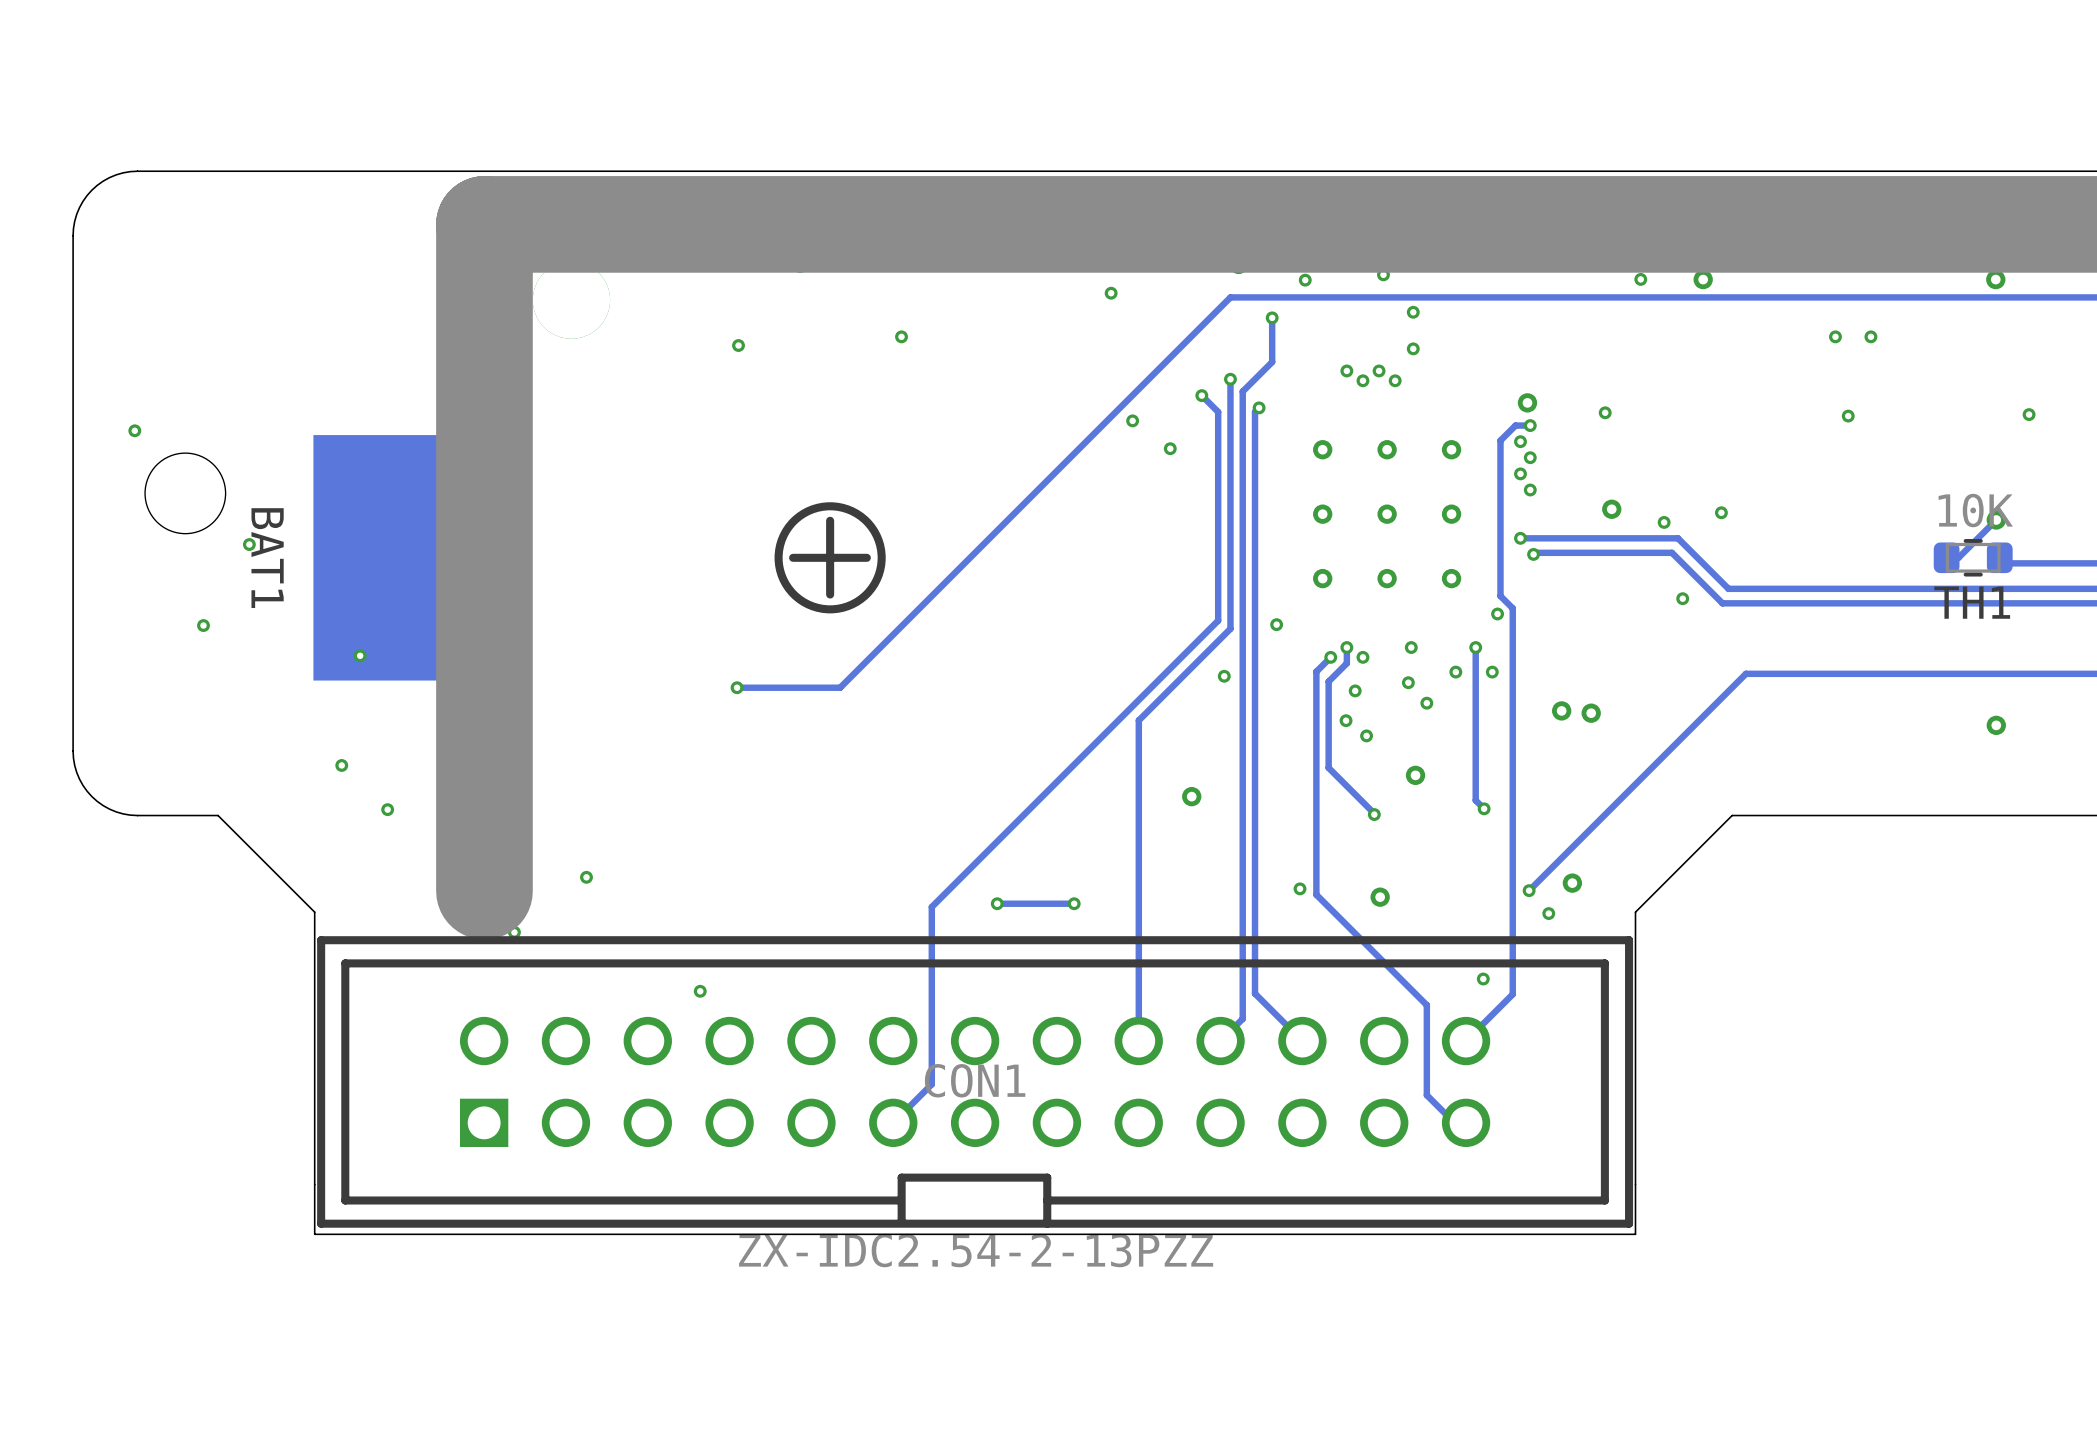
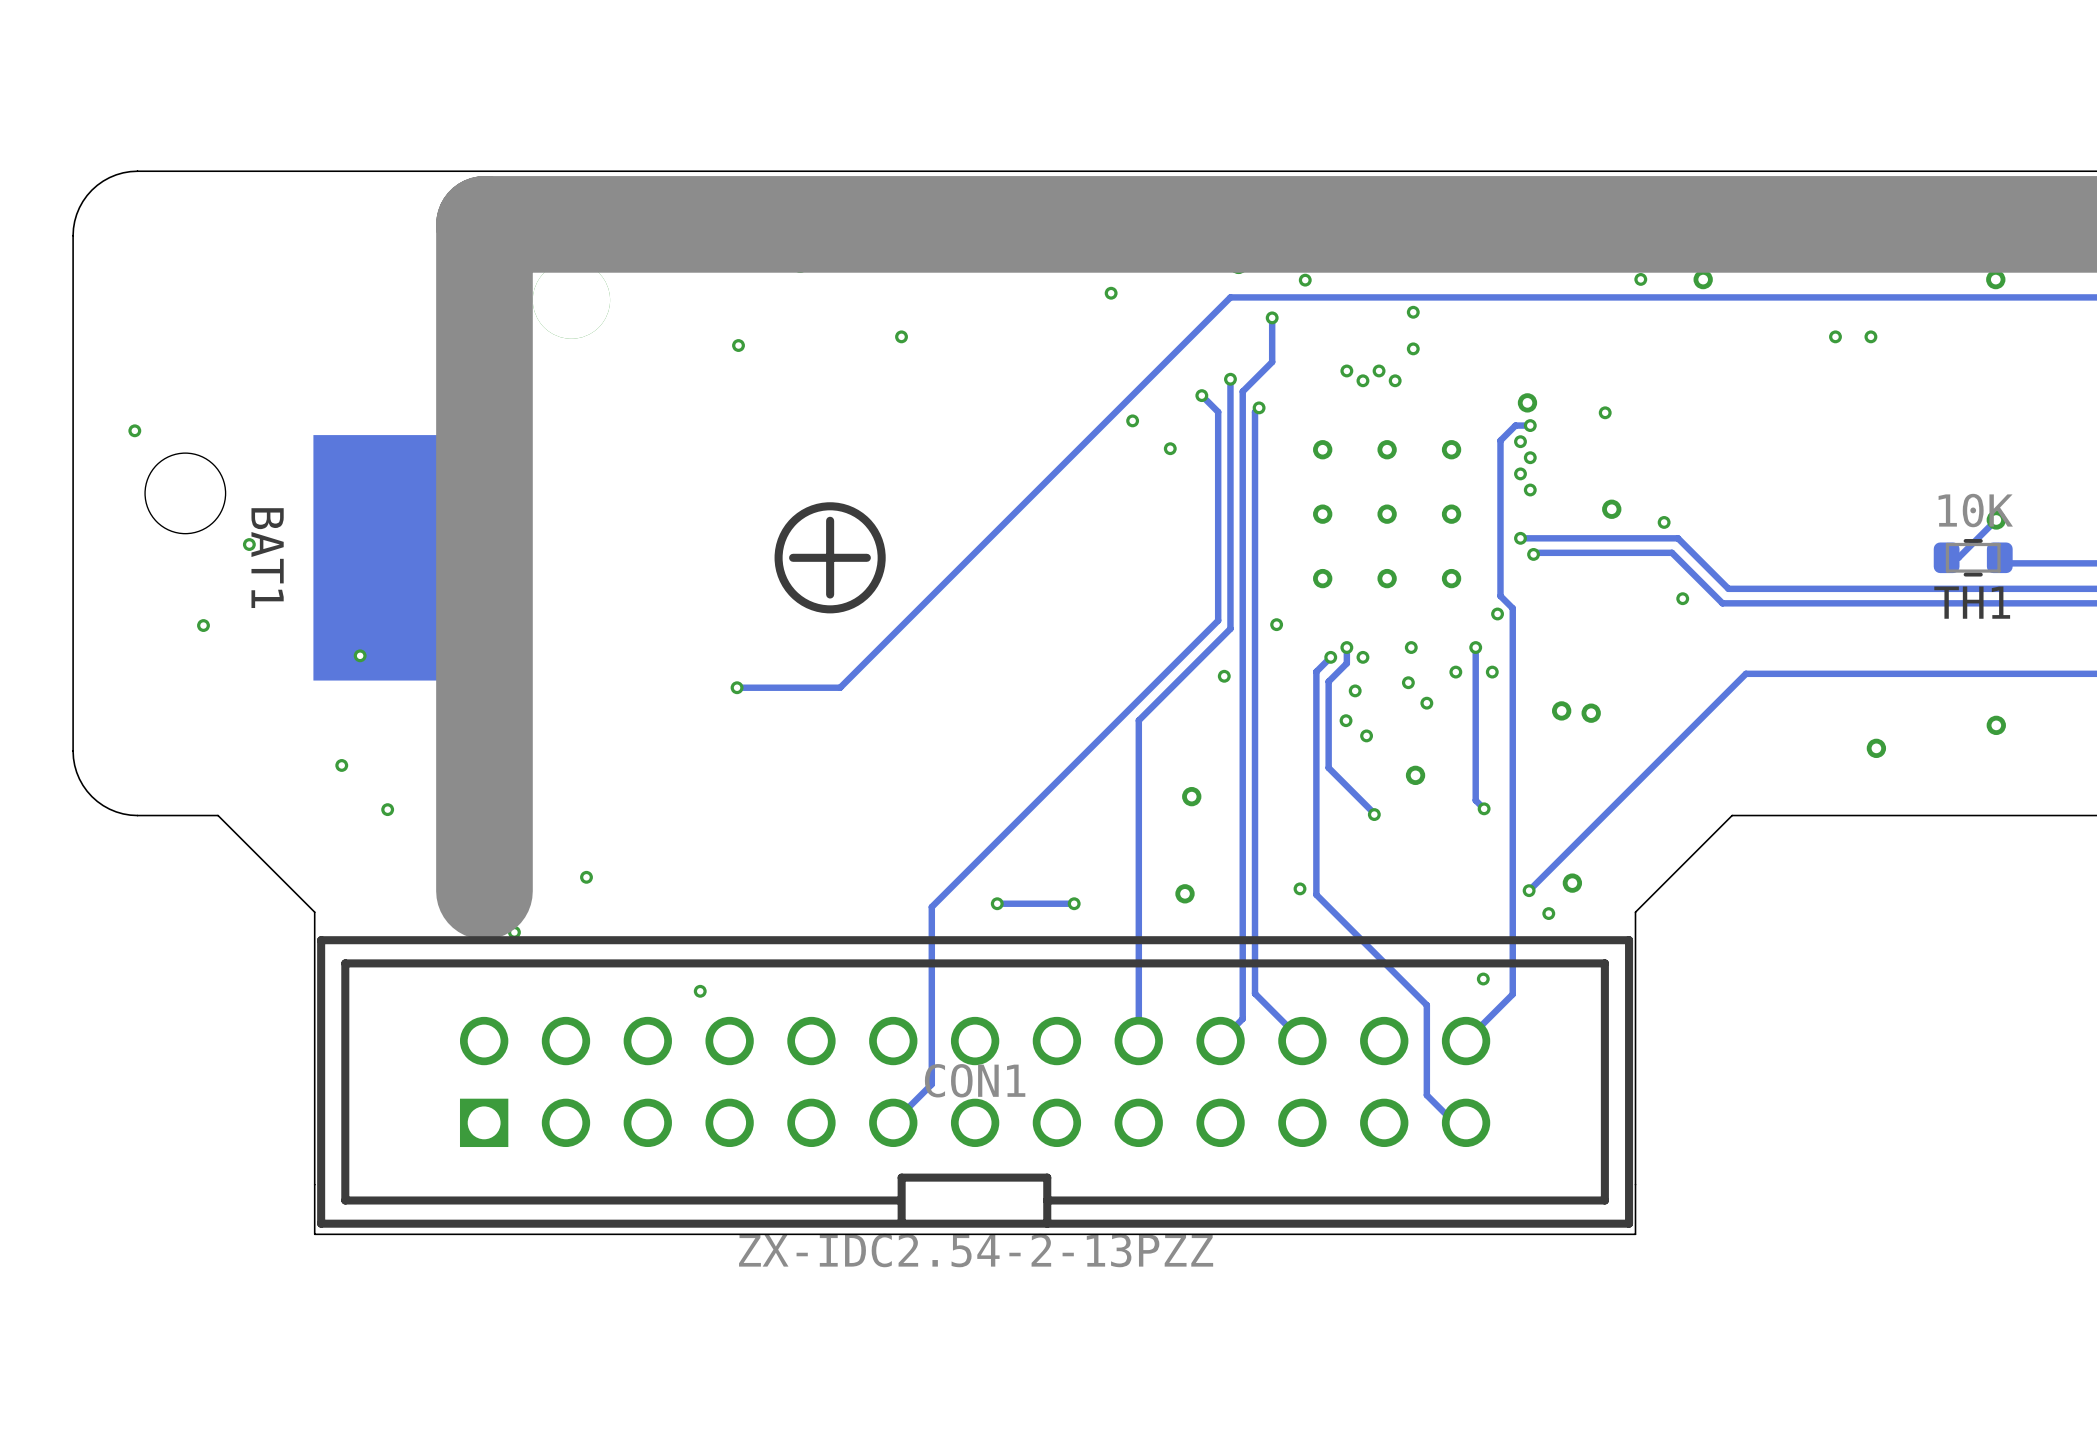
via position: (1383, 274) -> (1359, 253)
via: (2029, 414) -> none
via: (1848, 416) -> none
via: (1721, 512) -> none
via: none -> (1876, 748)
via: none -> (1185, 893)
via: (1380, 897) -> none

